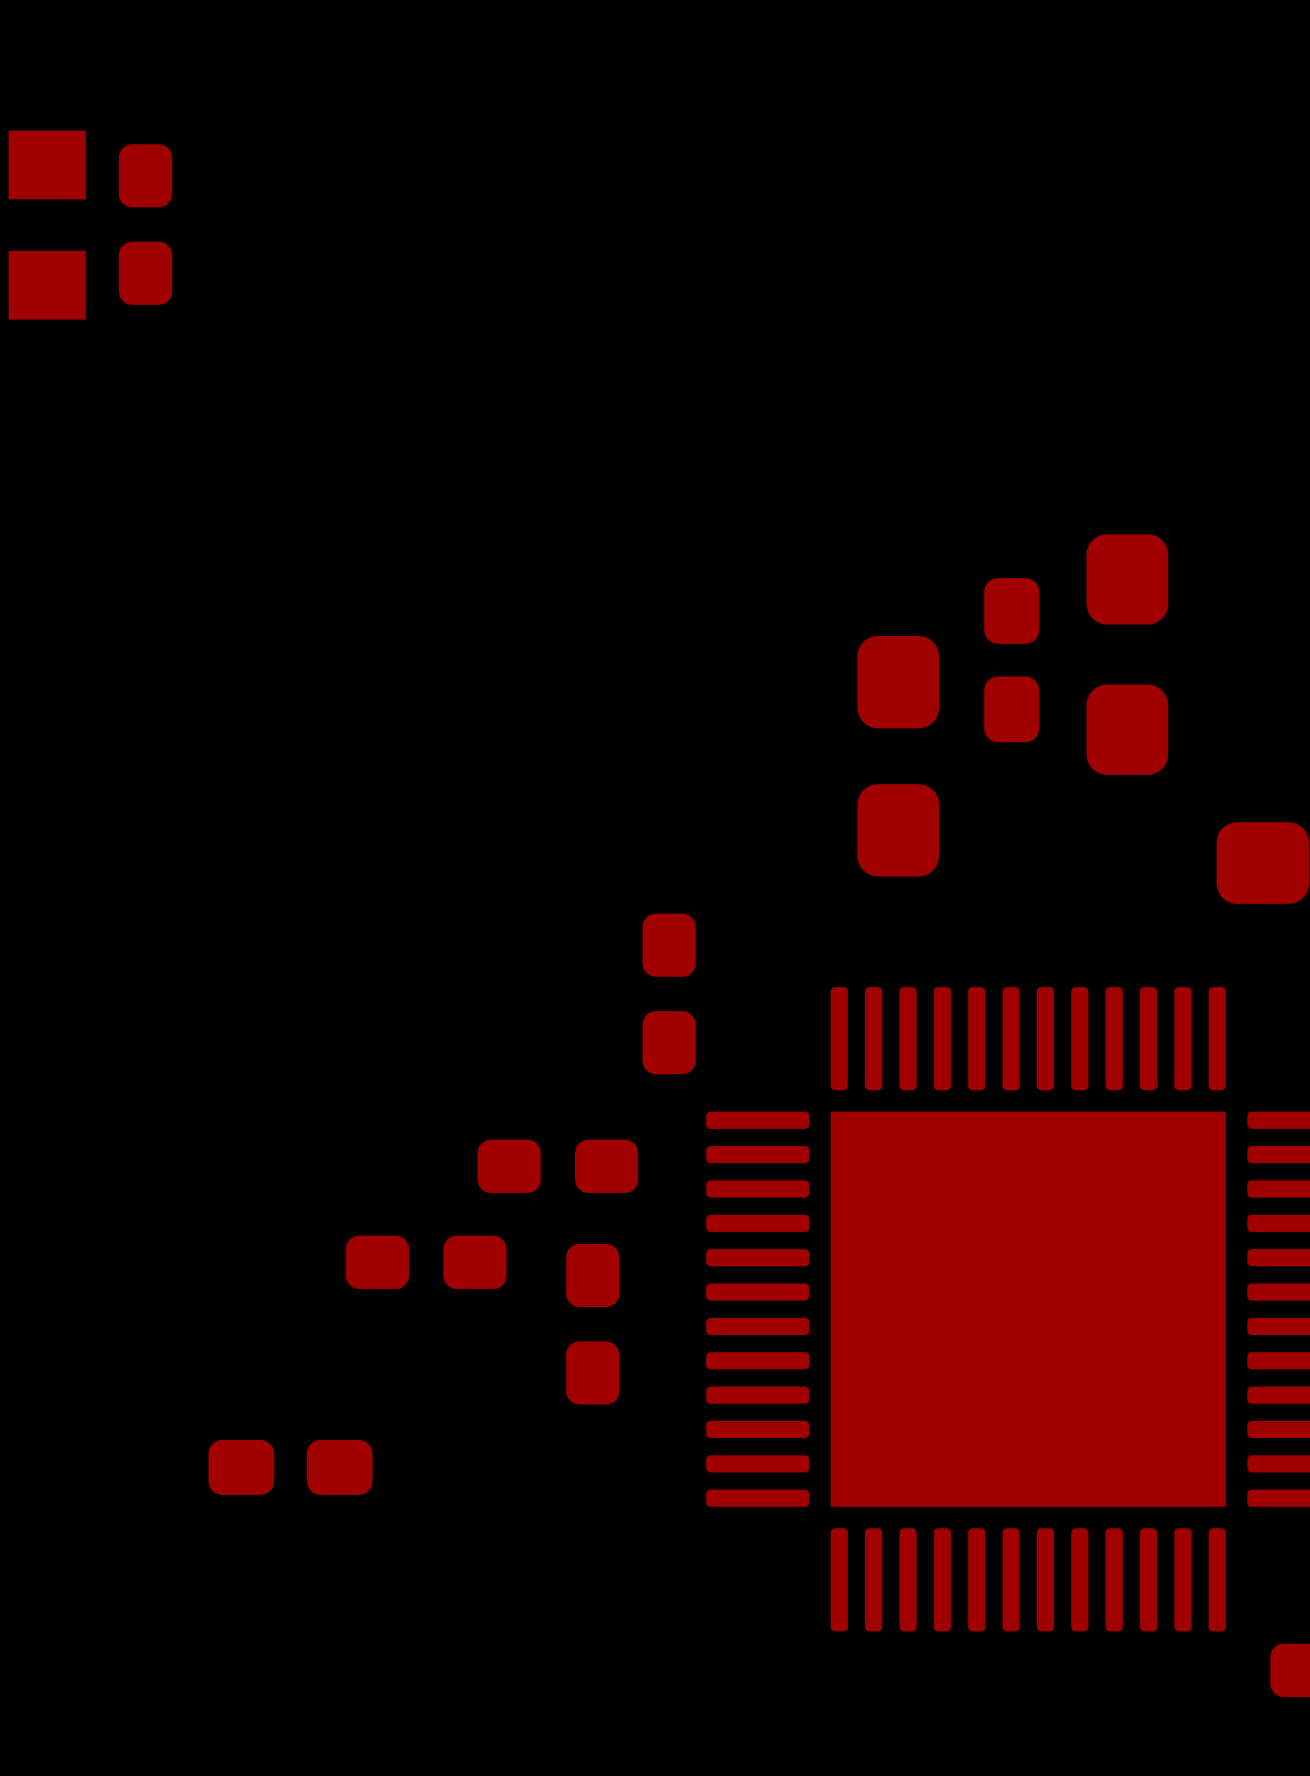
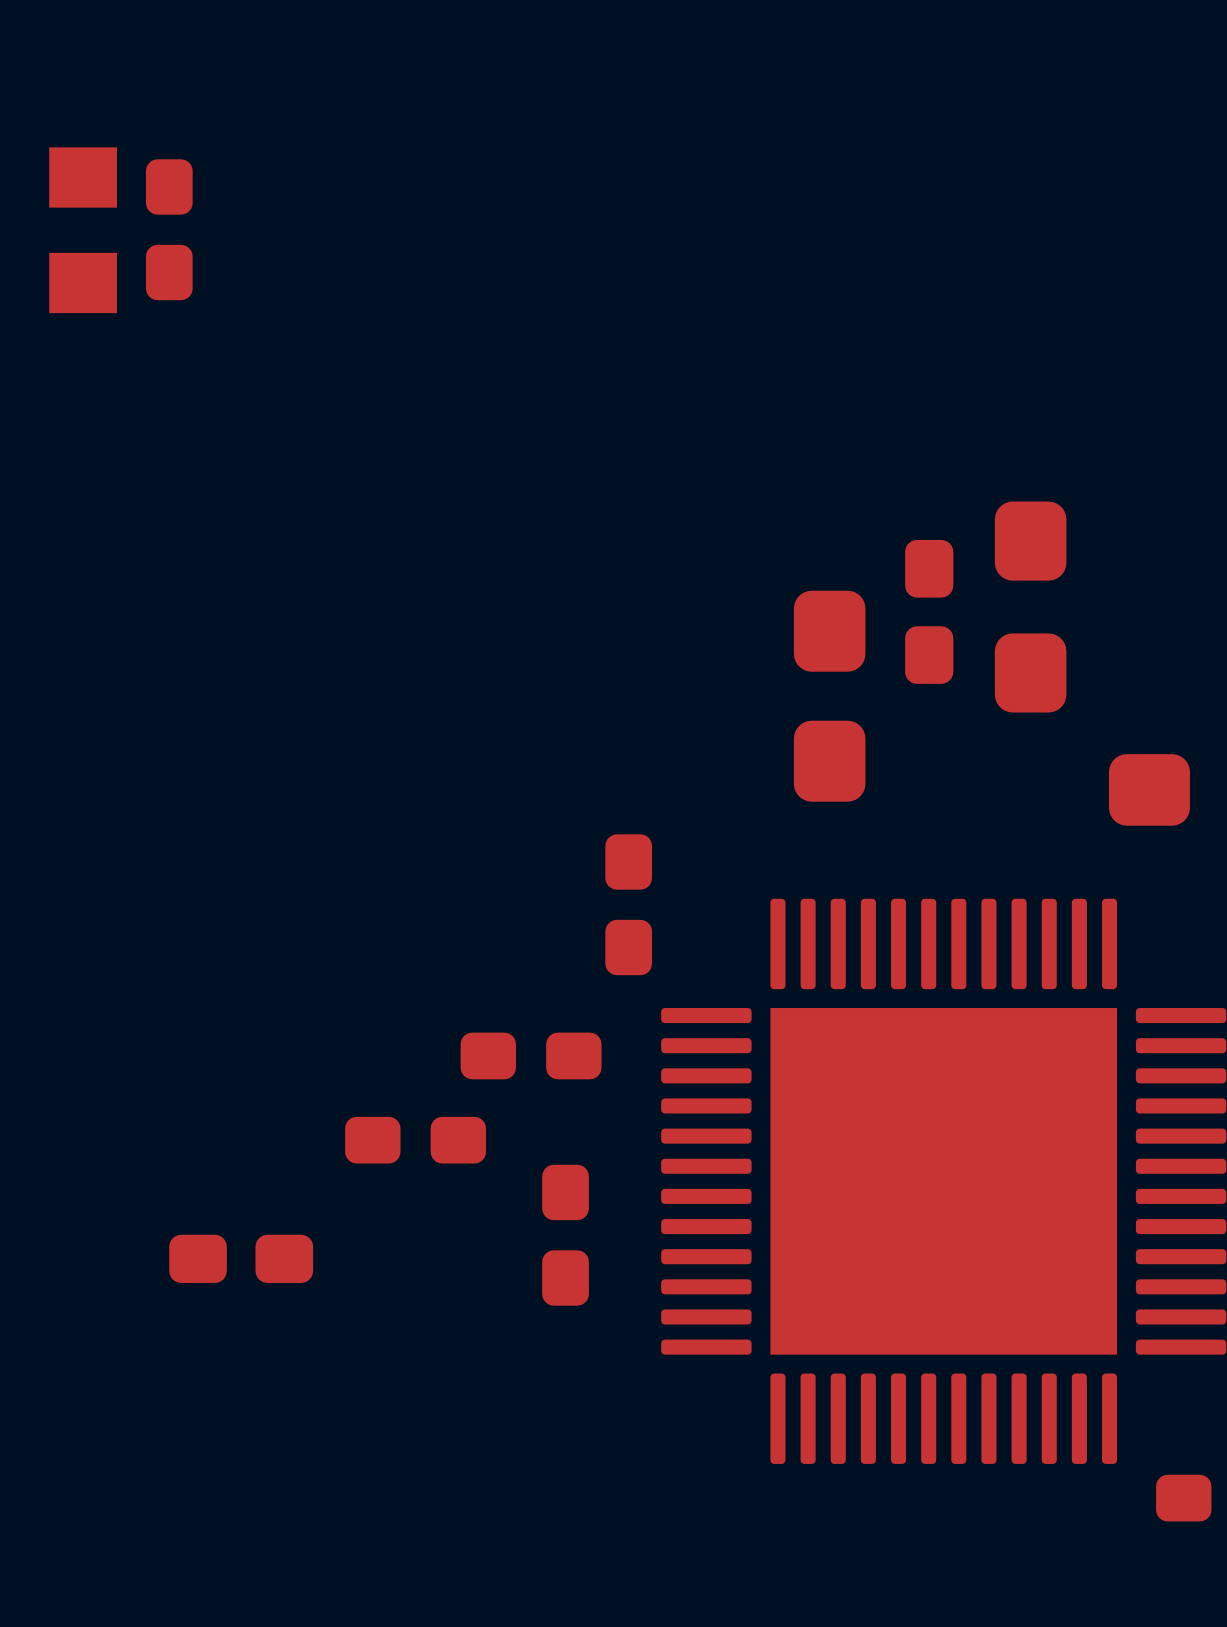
part position: (592, 1324) -> (565, 1235)
part position: (290, 1467) -> (241, 1258)

